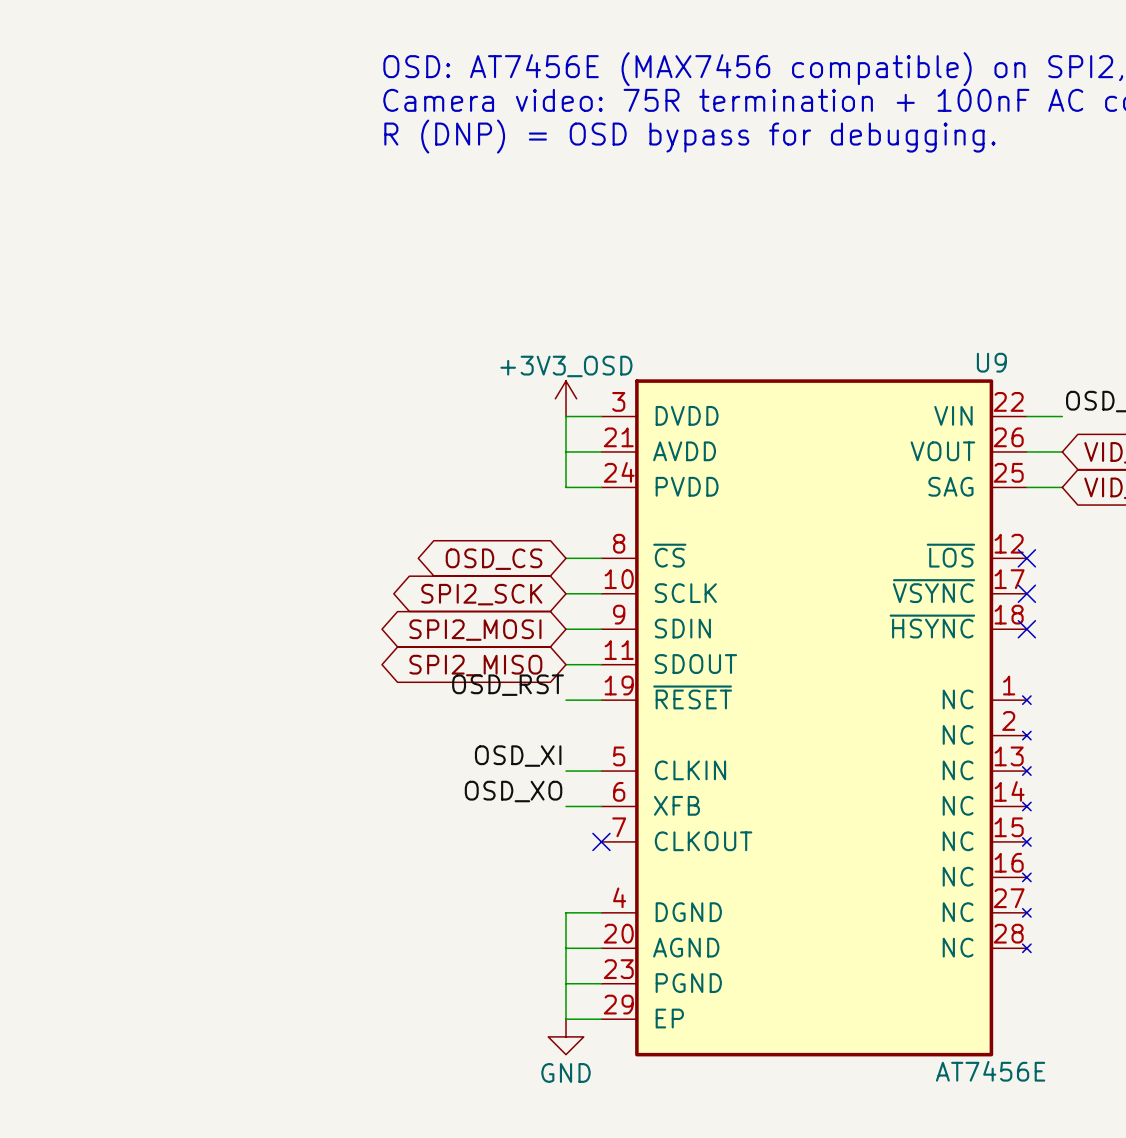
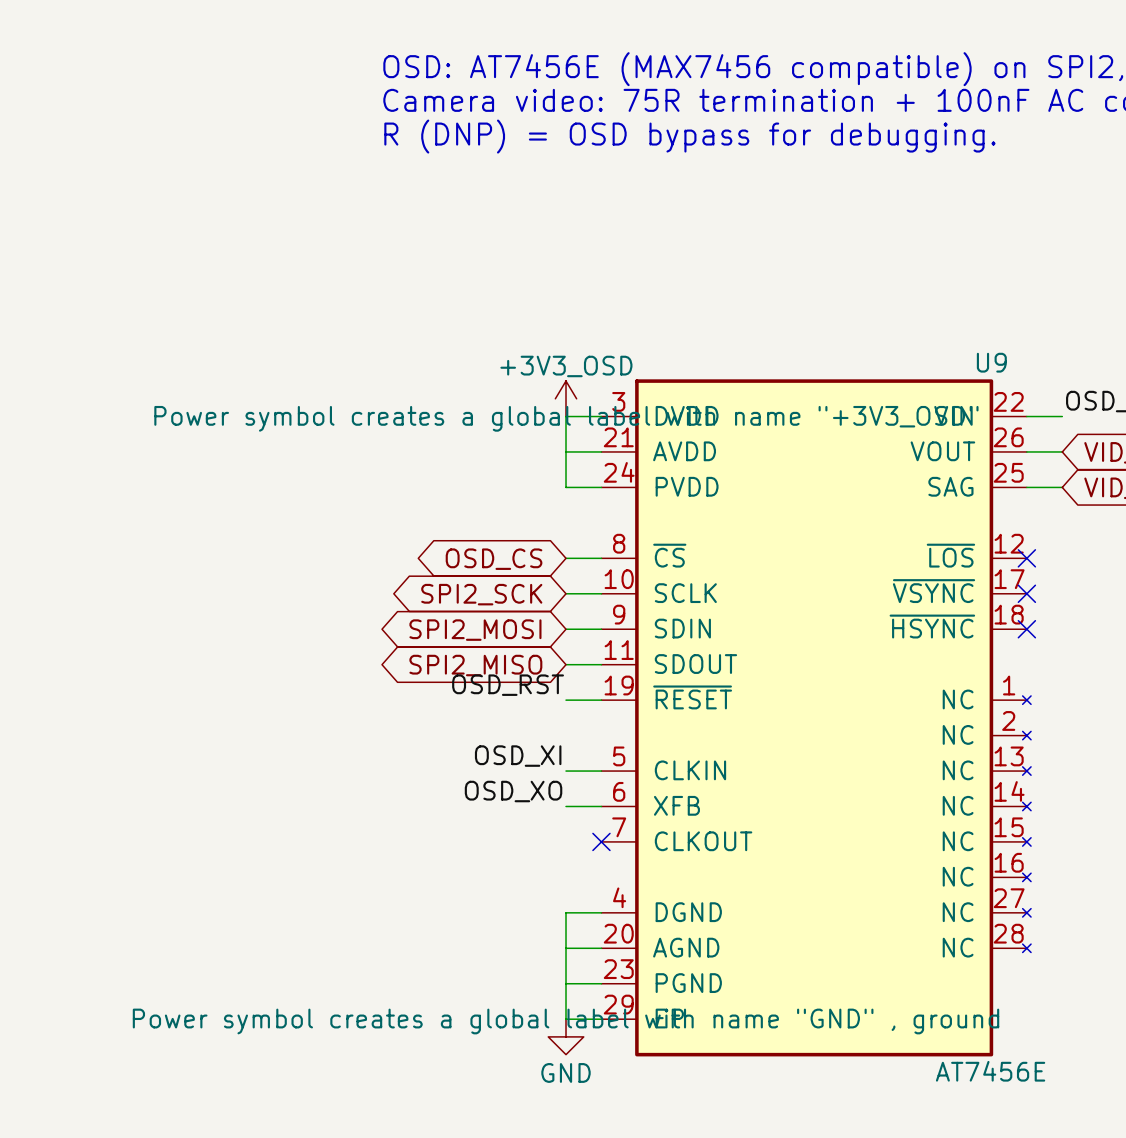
power symbol text: none -> Power symbol creates a global label with name "+3V3_OSD" (566, 418)
power symbol text: none -> Power symbol creates a global label with name "GND" , ground (566, 1021)

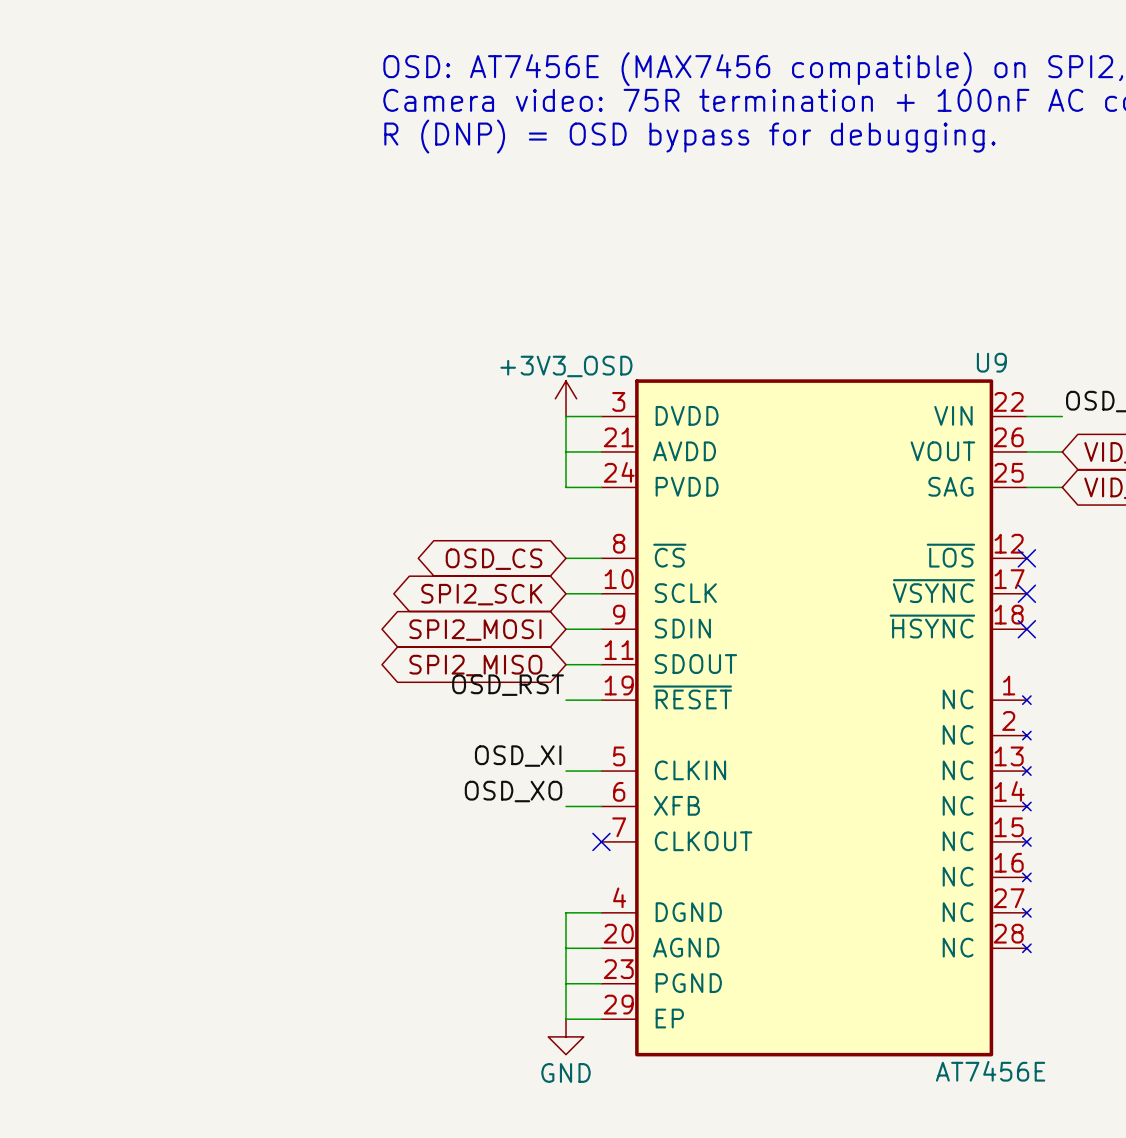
power symbol text: Power symbol creates a global label with name "+3V3_OSD" (566, 418) -> none
power symbol text: Power symbol creates a global label with name "GND" , ground (566, 1021) -> none

